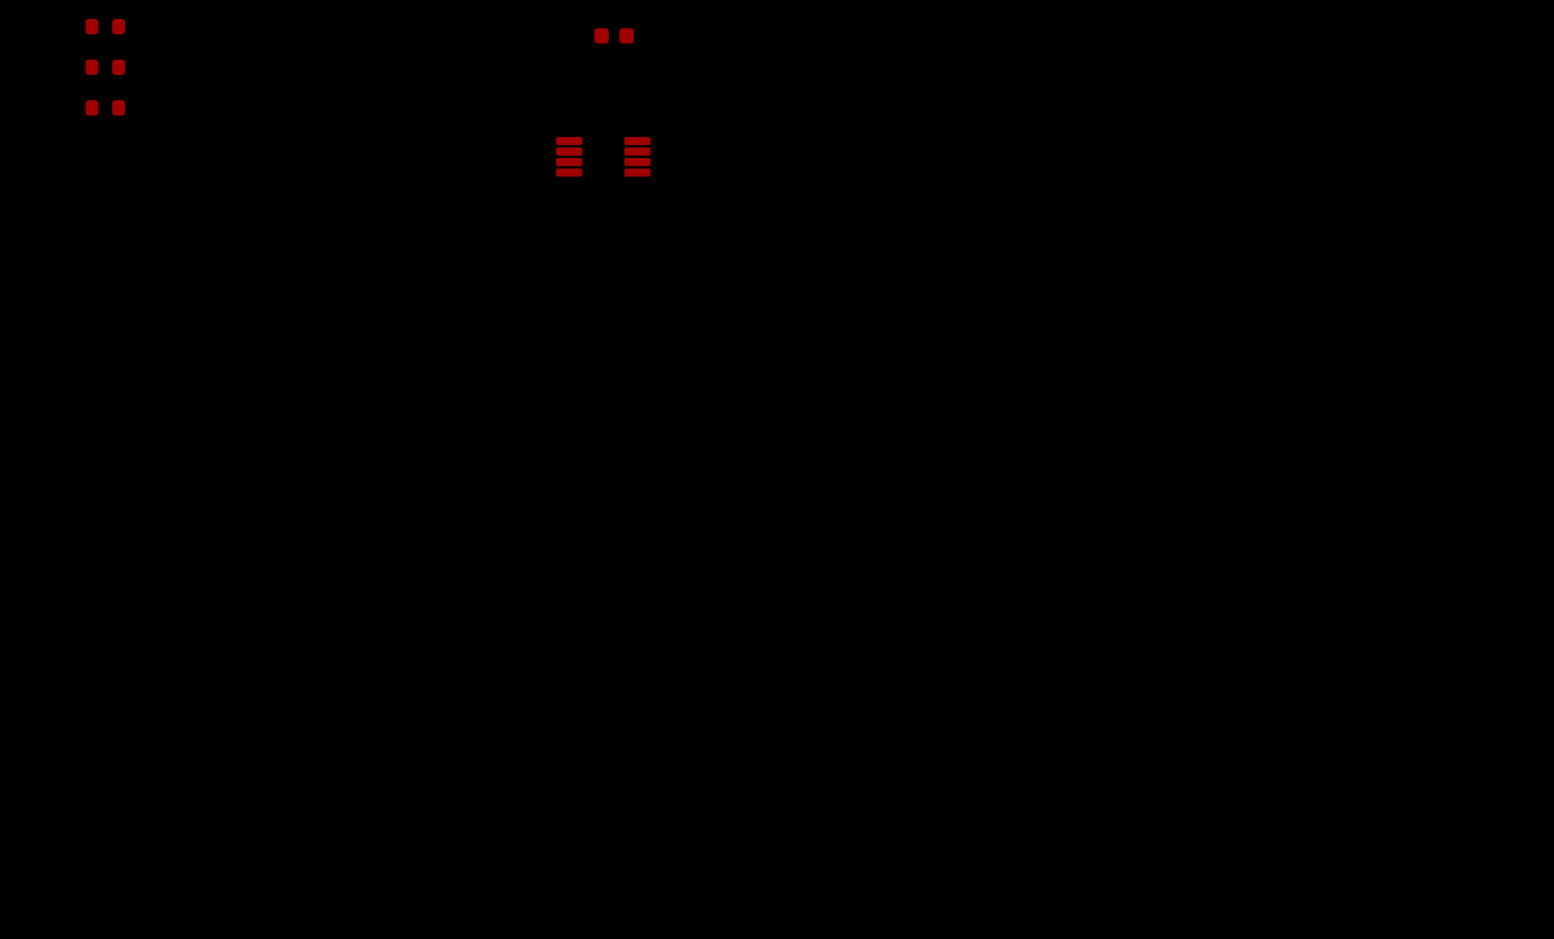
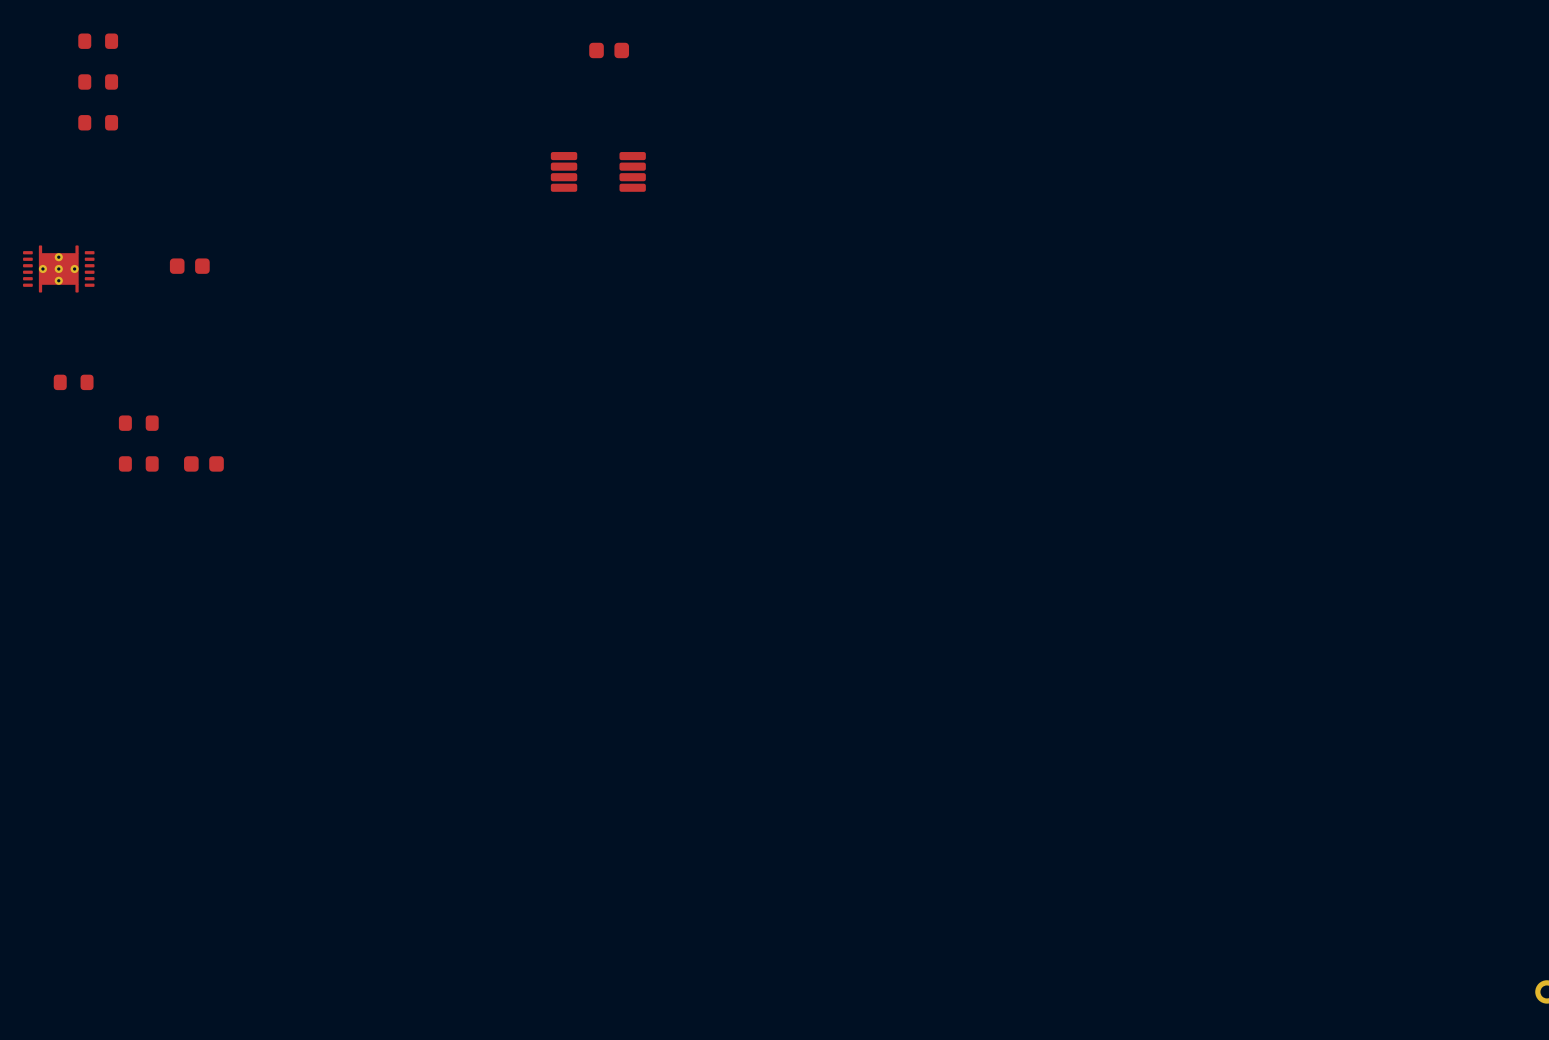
part: none -> (189, 266)
part: none -> (58, 268)
part: none -> (73, 382)
part: none -> (138, 423)
part: none -> (138, 463)
part: none -> (203, 463)

